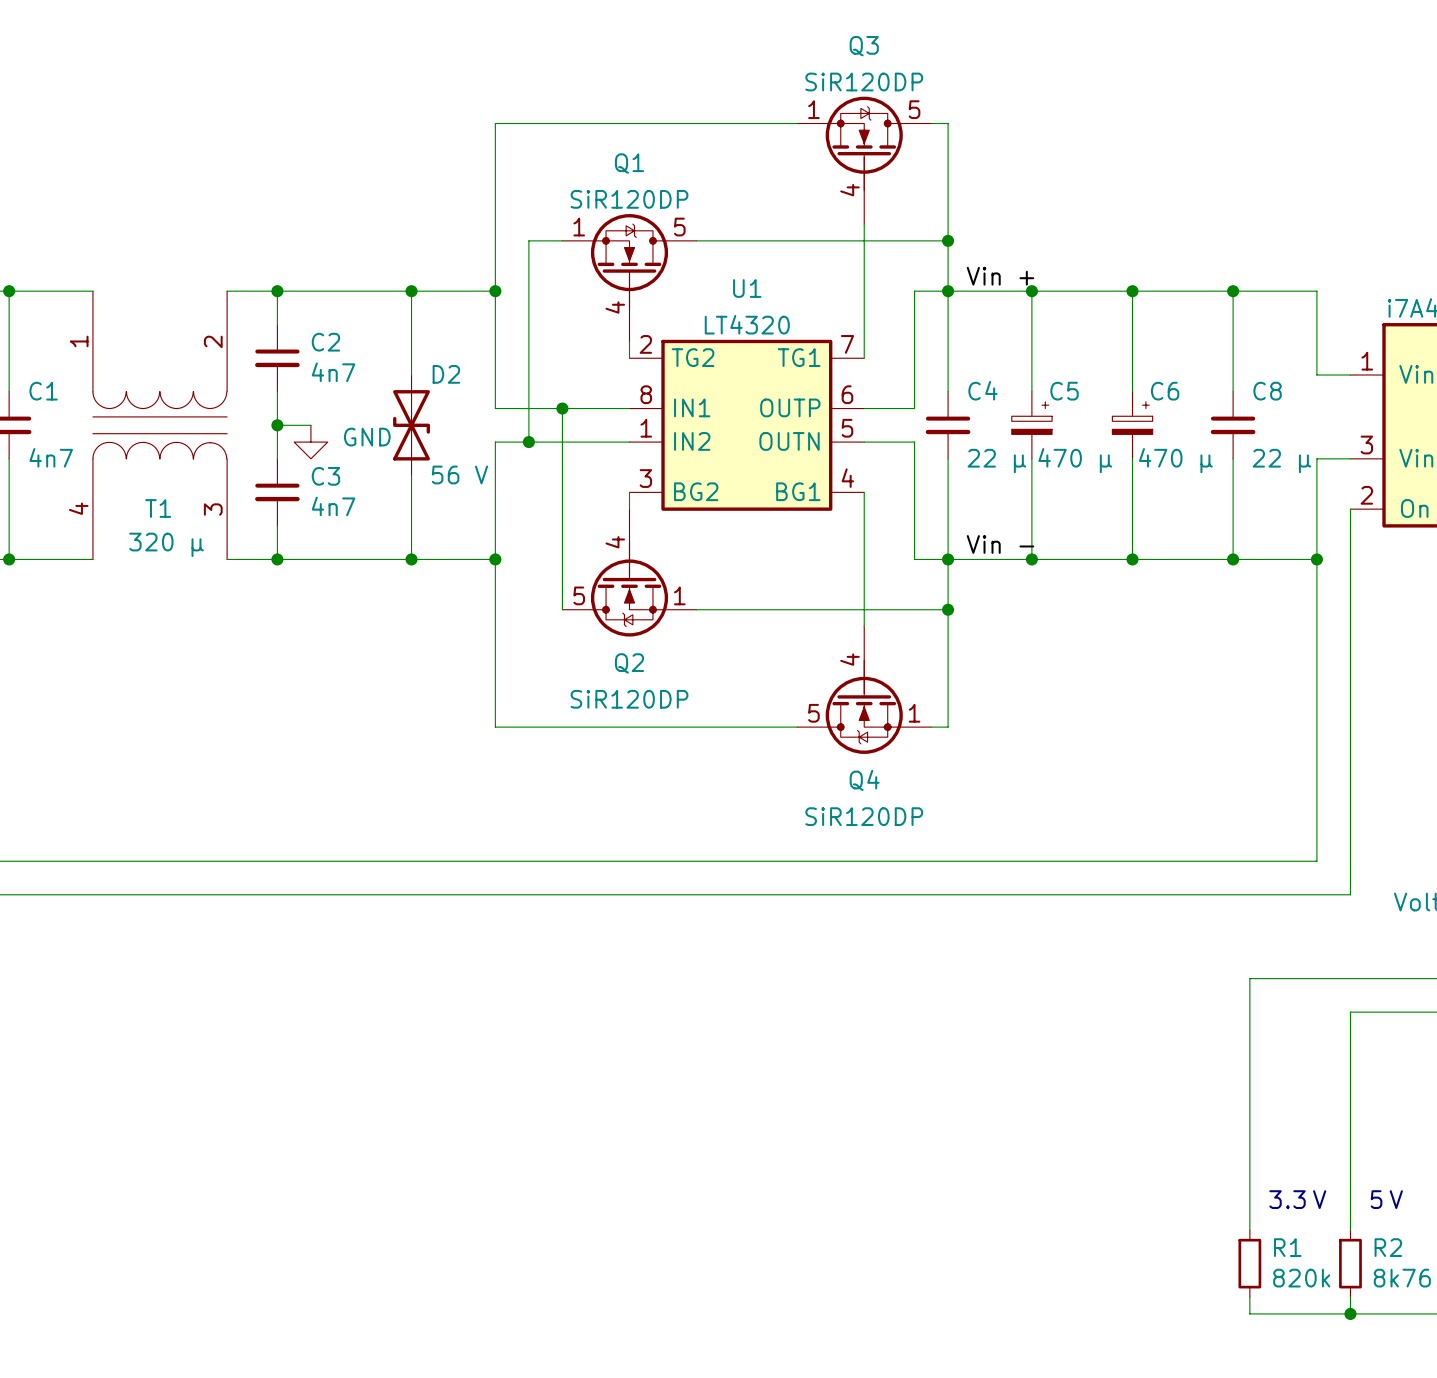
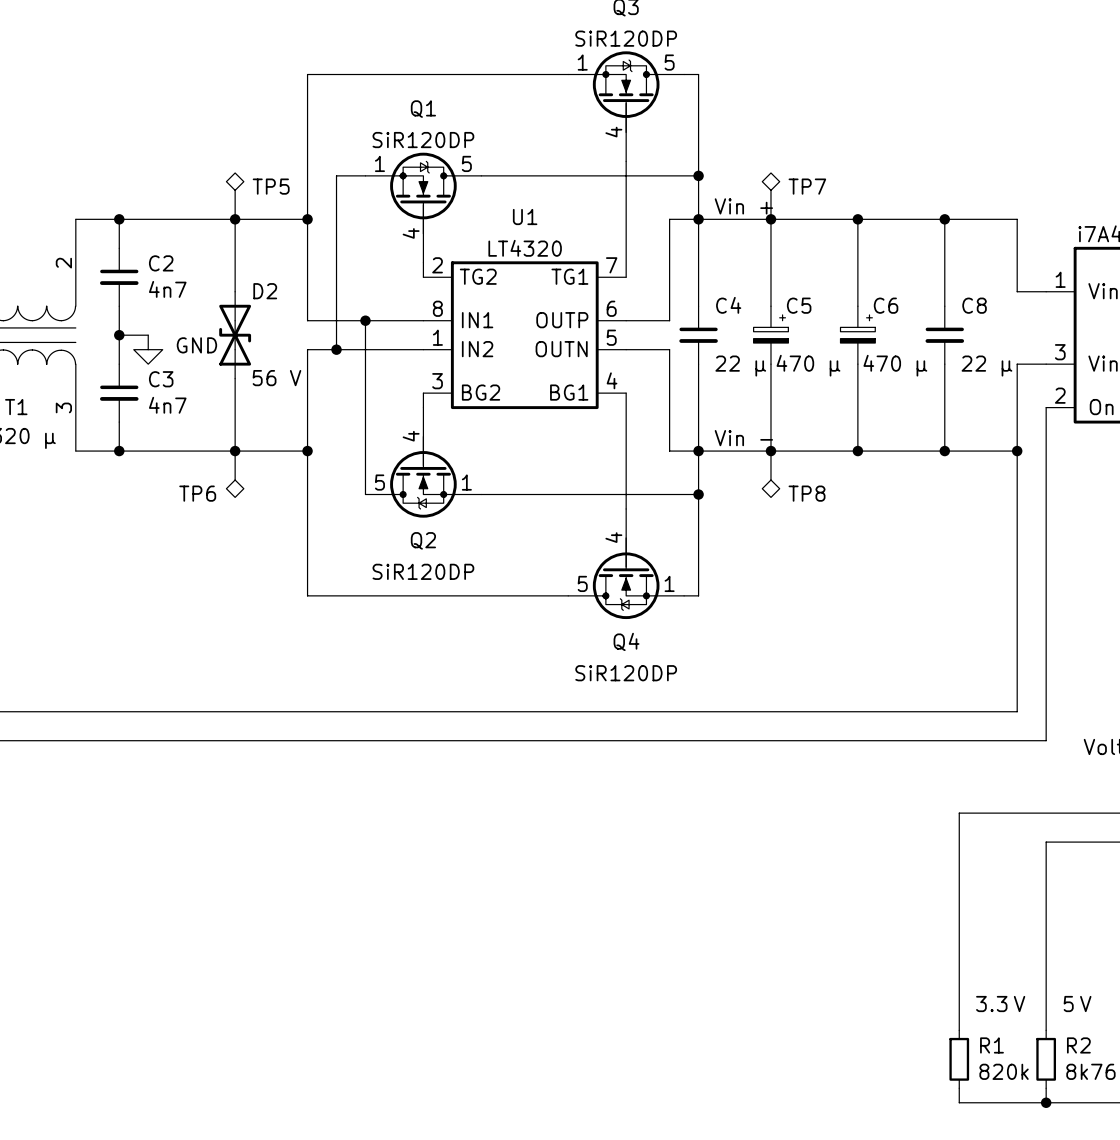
TP5: none -> (235, 196)
TP7: none -> (770, 196)
TP6: none -> (235, 474)
TP8: none -> (770, 474)

